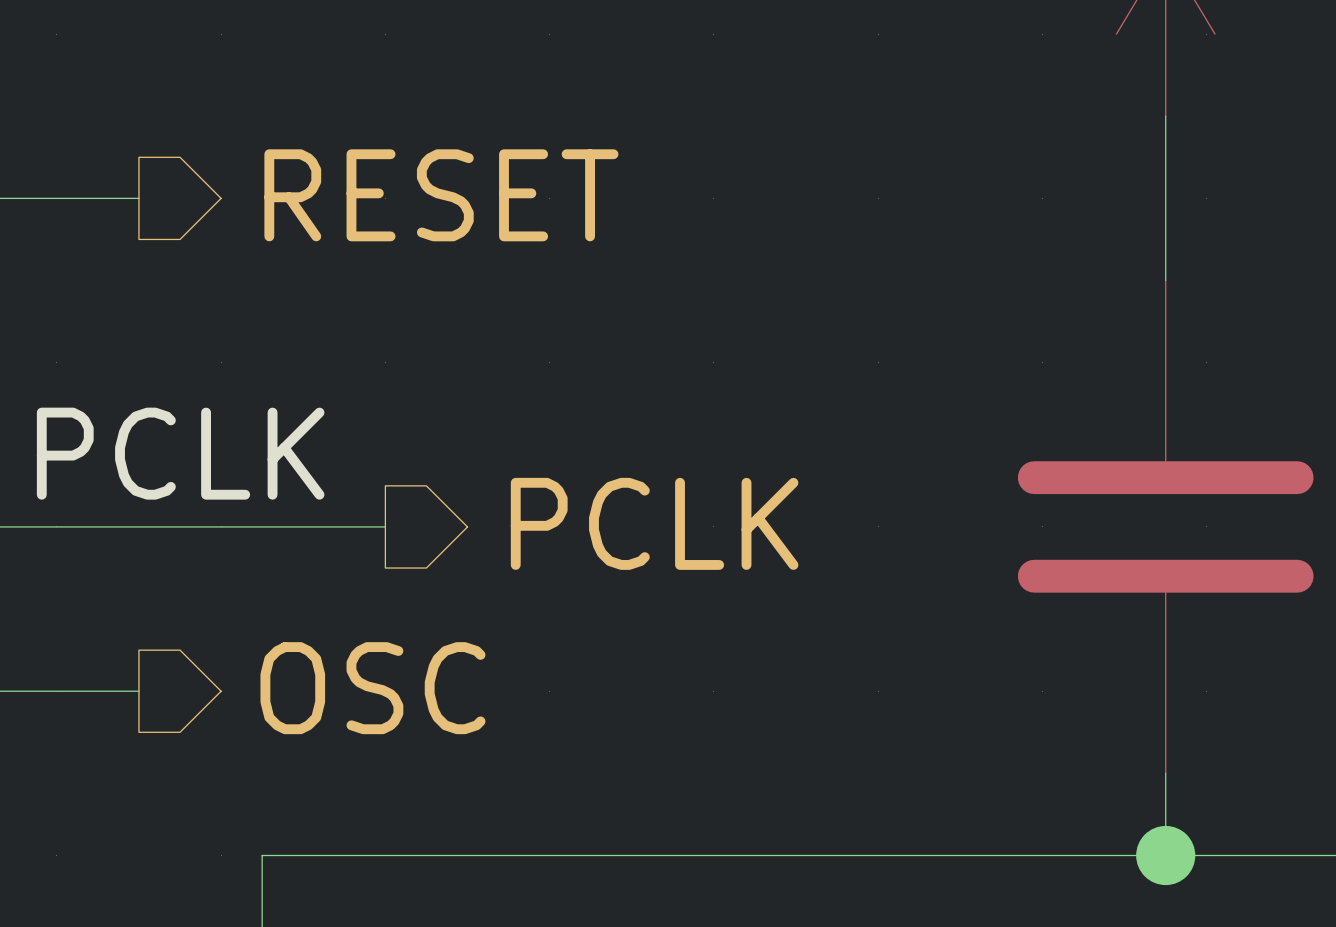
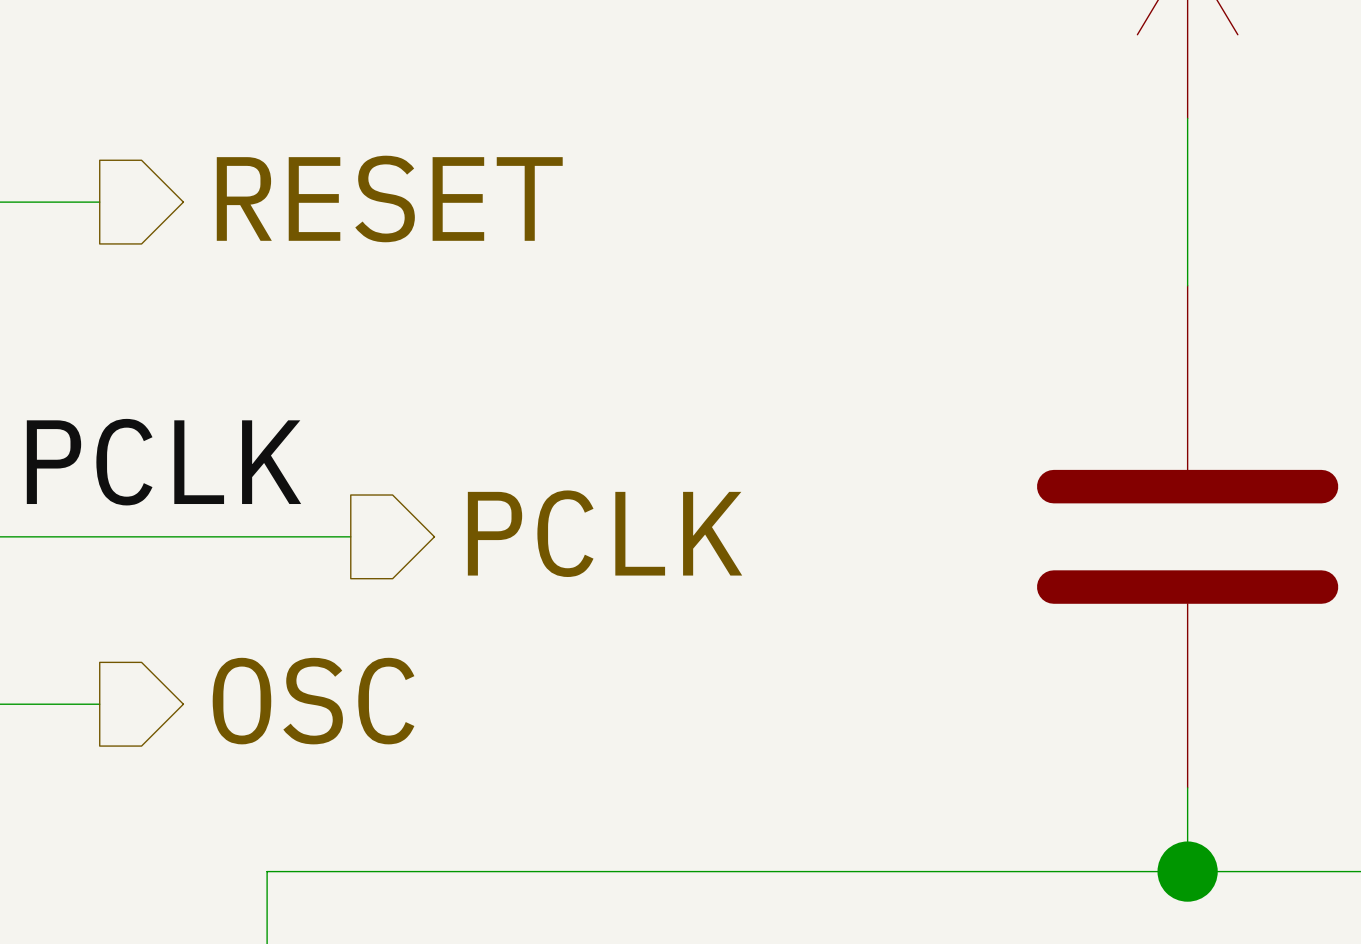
hierarchical label position: RESET (441, 195) -> RESET (389, 198)
wire: (97, 198) (138, 198) -> none
hierarchical label position: PCLK (654, 523) -> PCLK (605, 533)
wire: (344, 526) (385, 526) -> none
hierarchical label position: OSC (372, 688) -> OSC (313, 701)
wire: (97, 691) (138, 691) -> none

